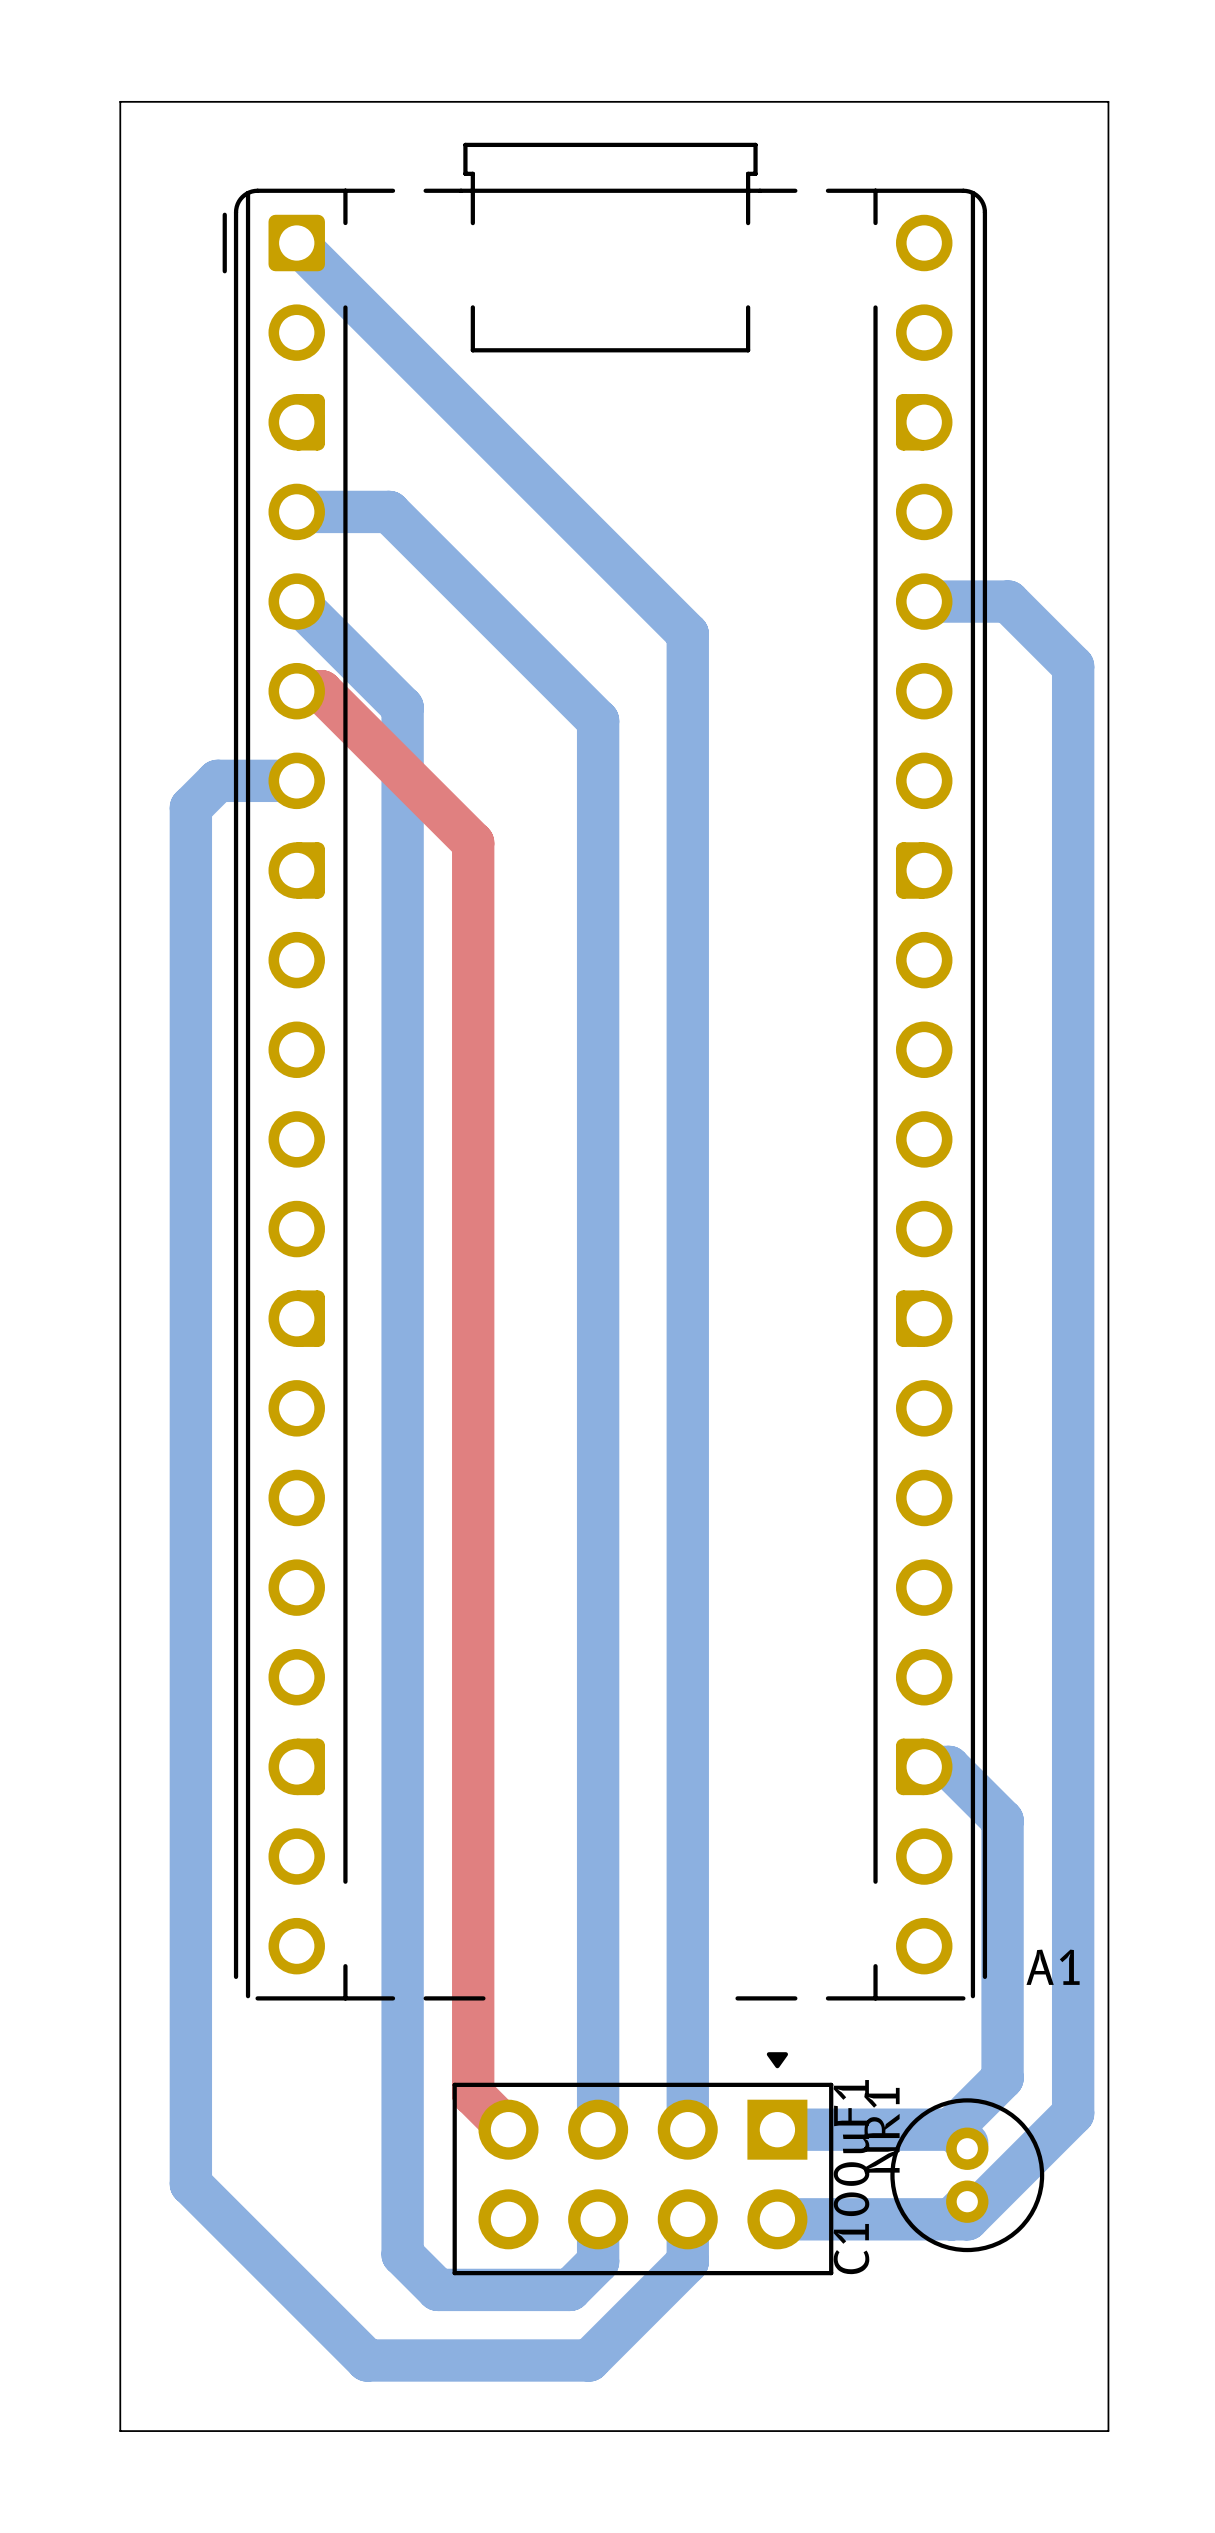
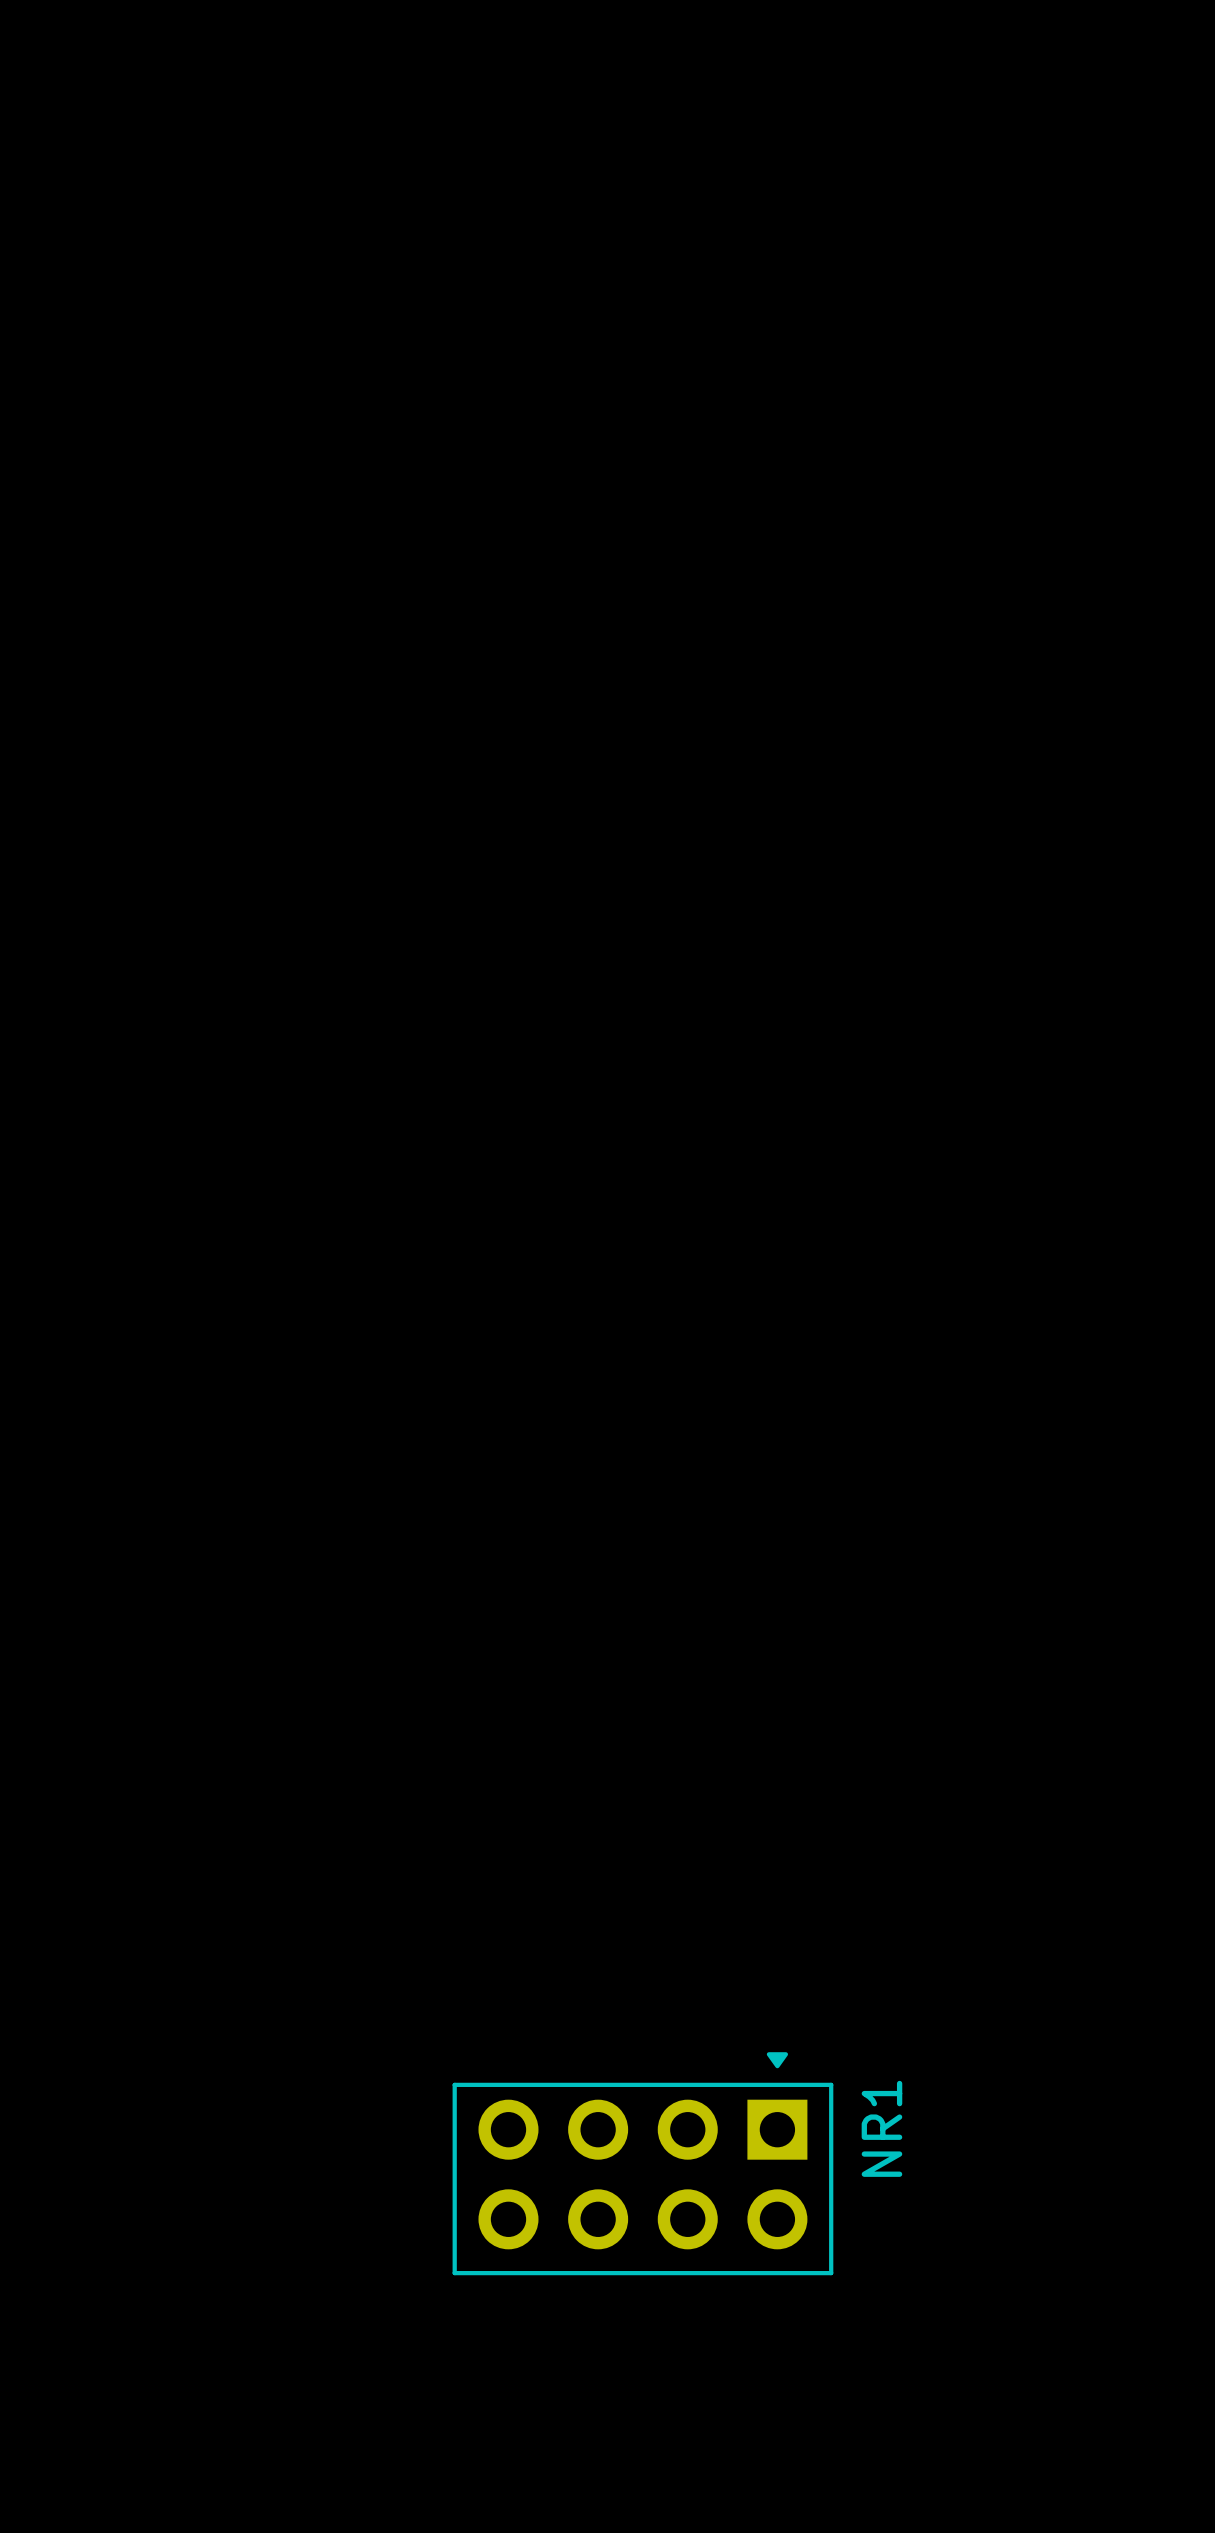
board edge: (120, 101) (1108, 101) (1108, 2431) (120, 2431) (120, 101) -> none
bottom track: (296, 243) (687, 634) (687, 2129) -> none
bottom track: (296, 511) (389, 511) (598, 720) (598, 2129) -> none
bottom track: (296, 601) (402, 707) (402, 2254) (437, 2289) (569, 2289) (598, 2261) (598, 2219) -> none
bottom track: (924, 601) (1008, 601) (1073, 666) (1073, 2113) (967, 2219) (777, 2219) -> none
top track: (296, 691) (321, 691) (473, 842) (473, 2094) (508, 2129) -> none
bottom track: (296, 780) (217, 780) (190, 807) (190, 2184) (367, 2360) (589, 2360) (687, 2261) (687, 2219) -> none
A1: (604, 1071) -> none
bottom track: (924, 1766) (948, 1766) (1002, 1820) (1002, 2078) (953, 2127) (953, 2129) -> none
bottom track: (777, 2129) (953, 2129) -> none
C100uF1: (967, 2175) -> none

